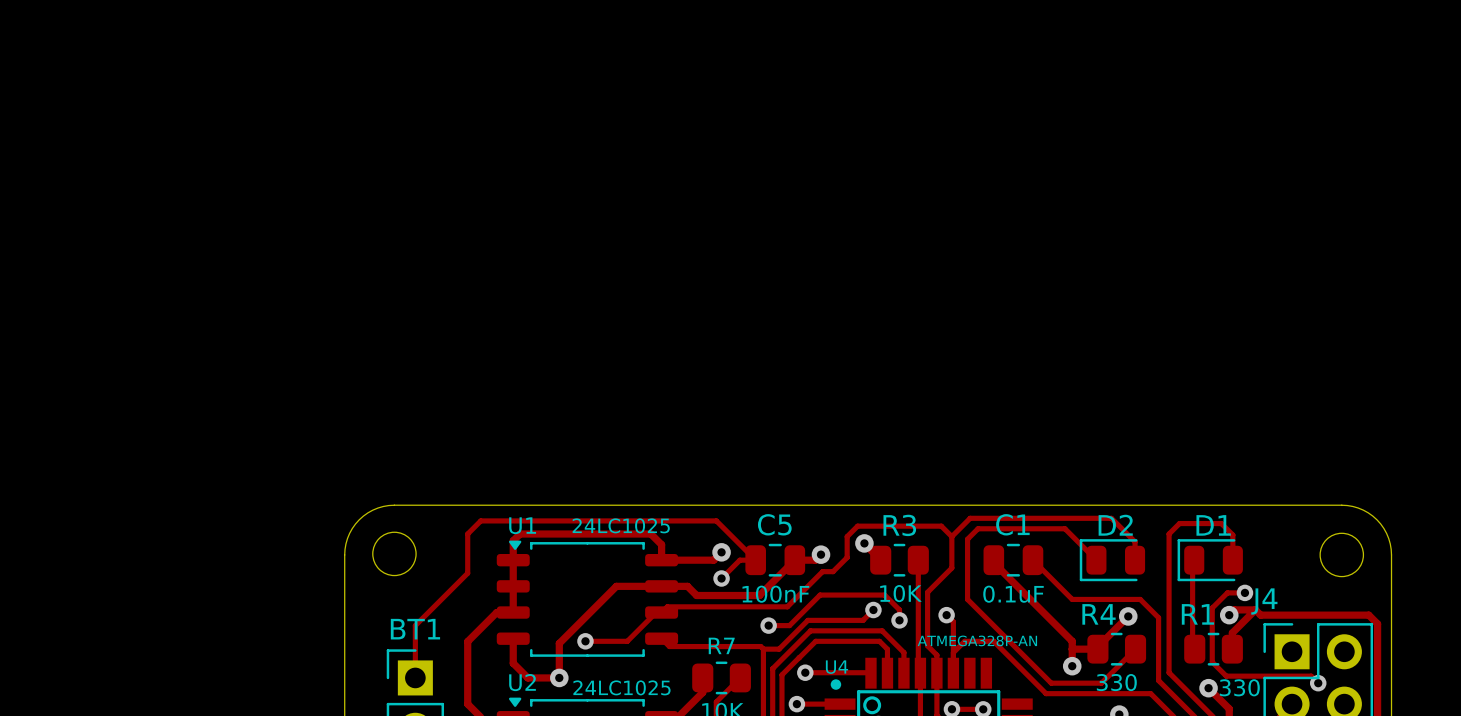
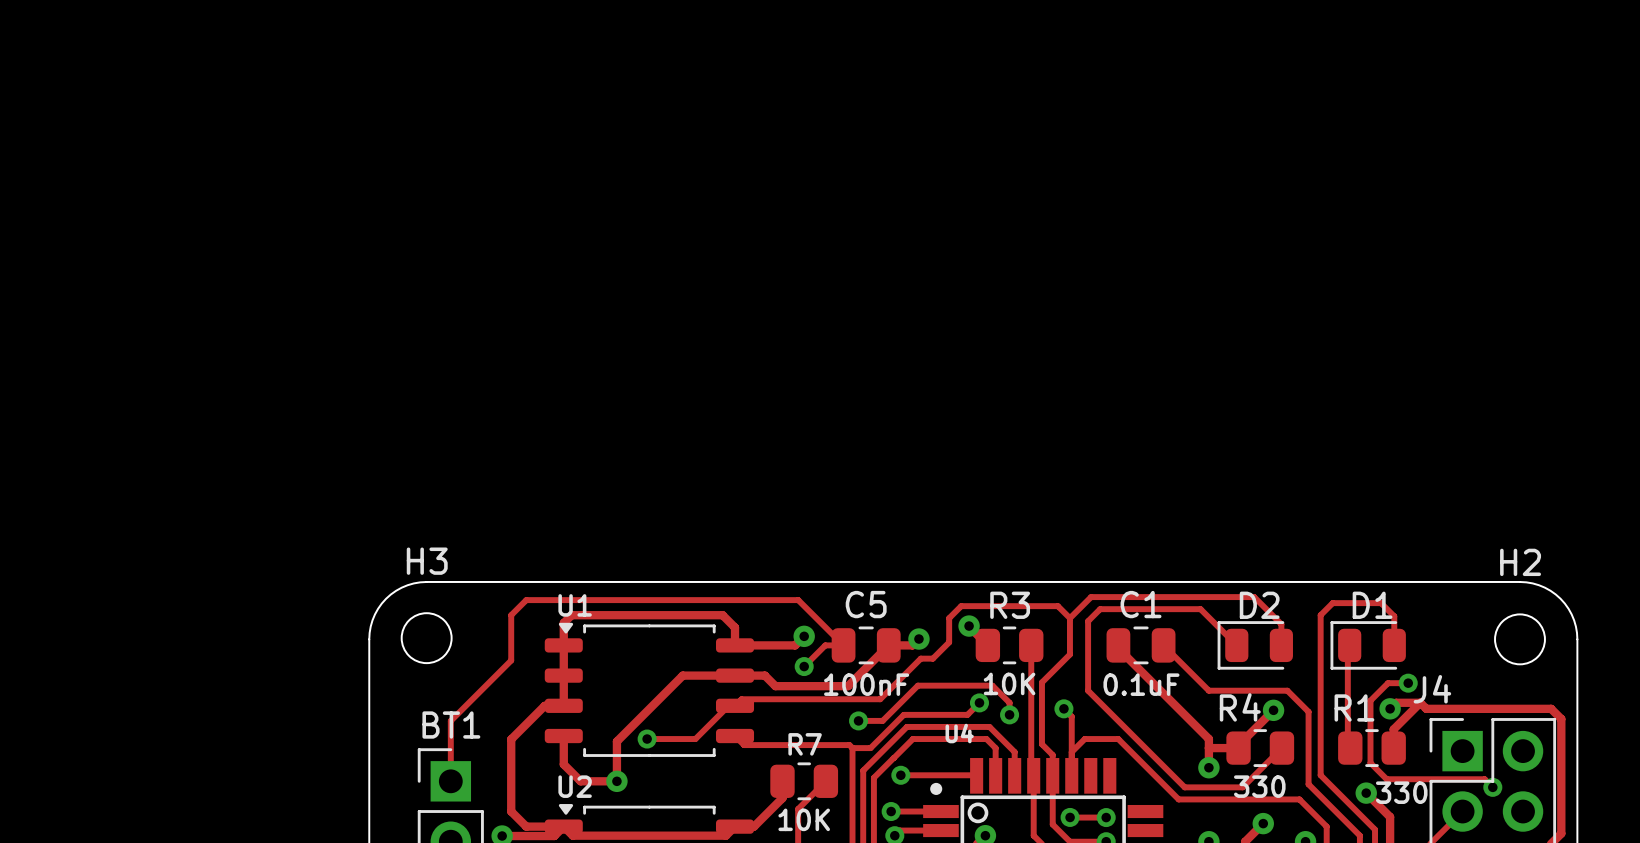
H3 name: none -> H3 (427, 561)
H2 name: none -> H2 (1520, 562)
U1 value: 24LC1025 (621, 525) -> none
U4 value: ATMEGA328P-AN (977, 640) -> none
U4 name position: U4 (836, 667) -> U4 (959, 733)
U2 value: 24LC1025 (621, 687) -> none

